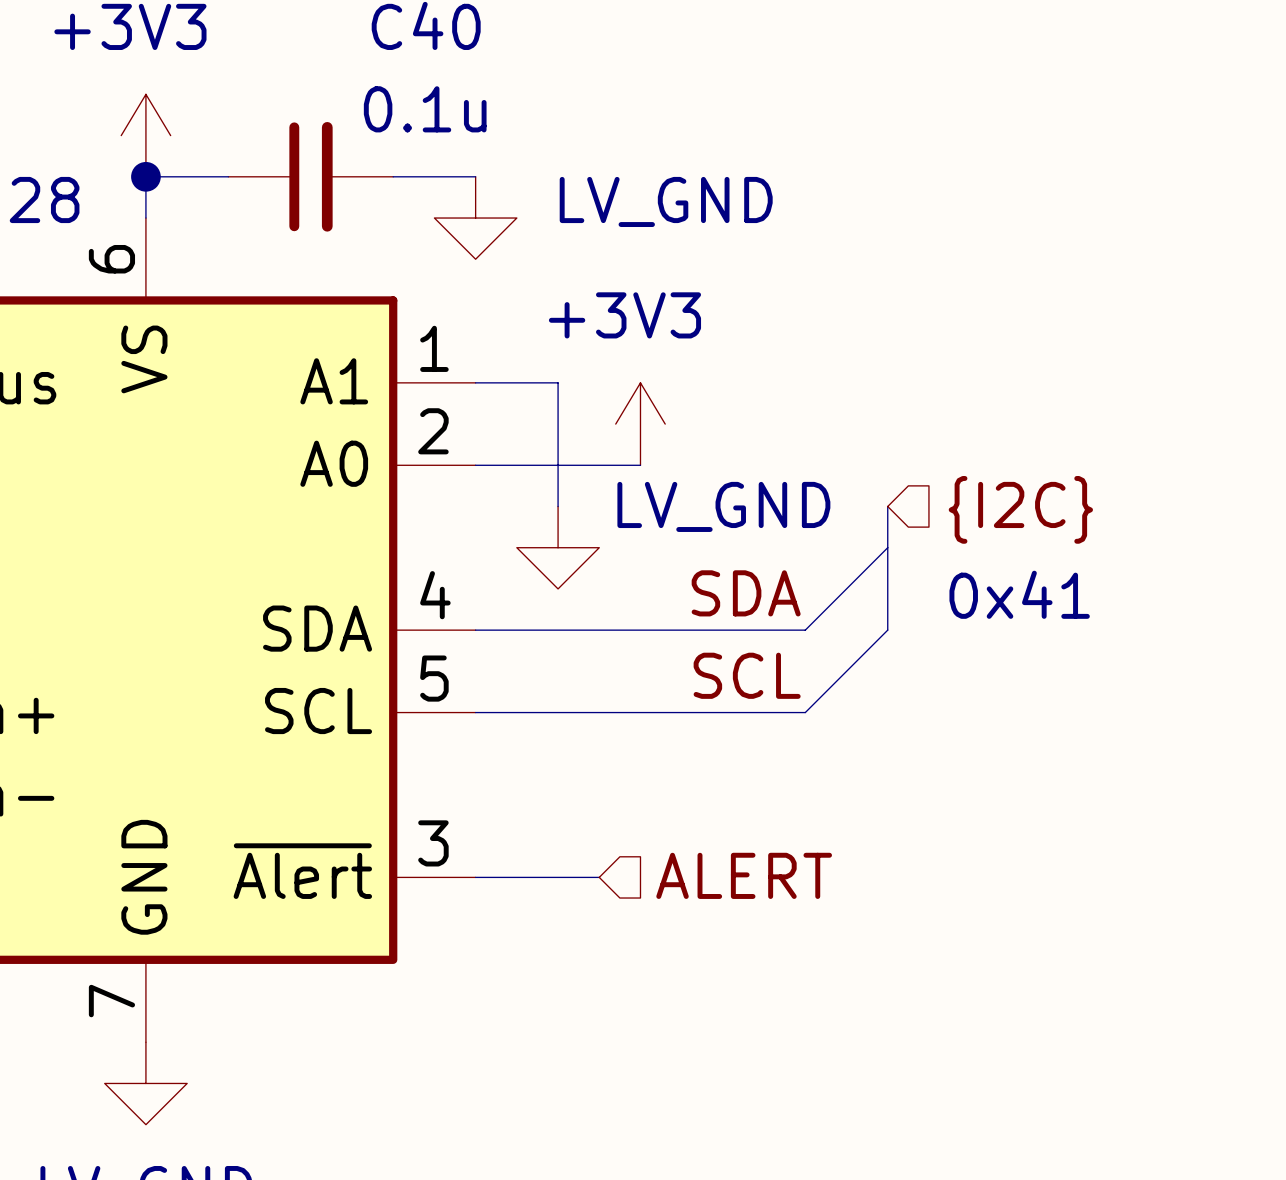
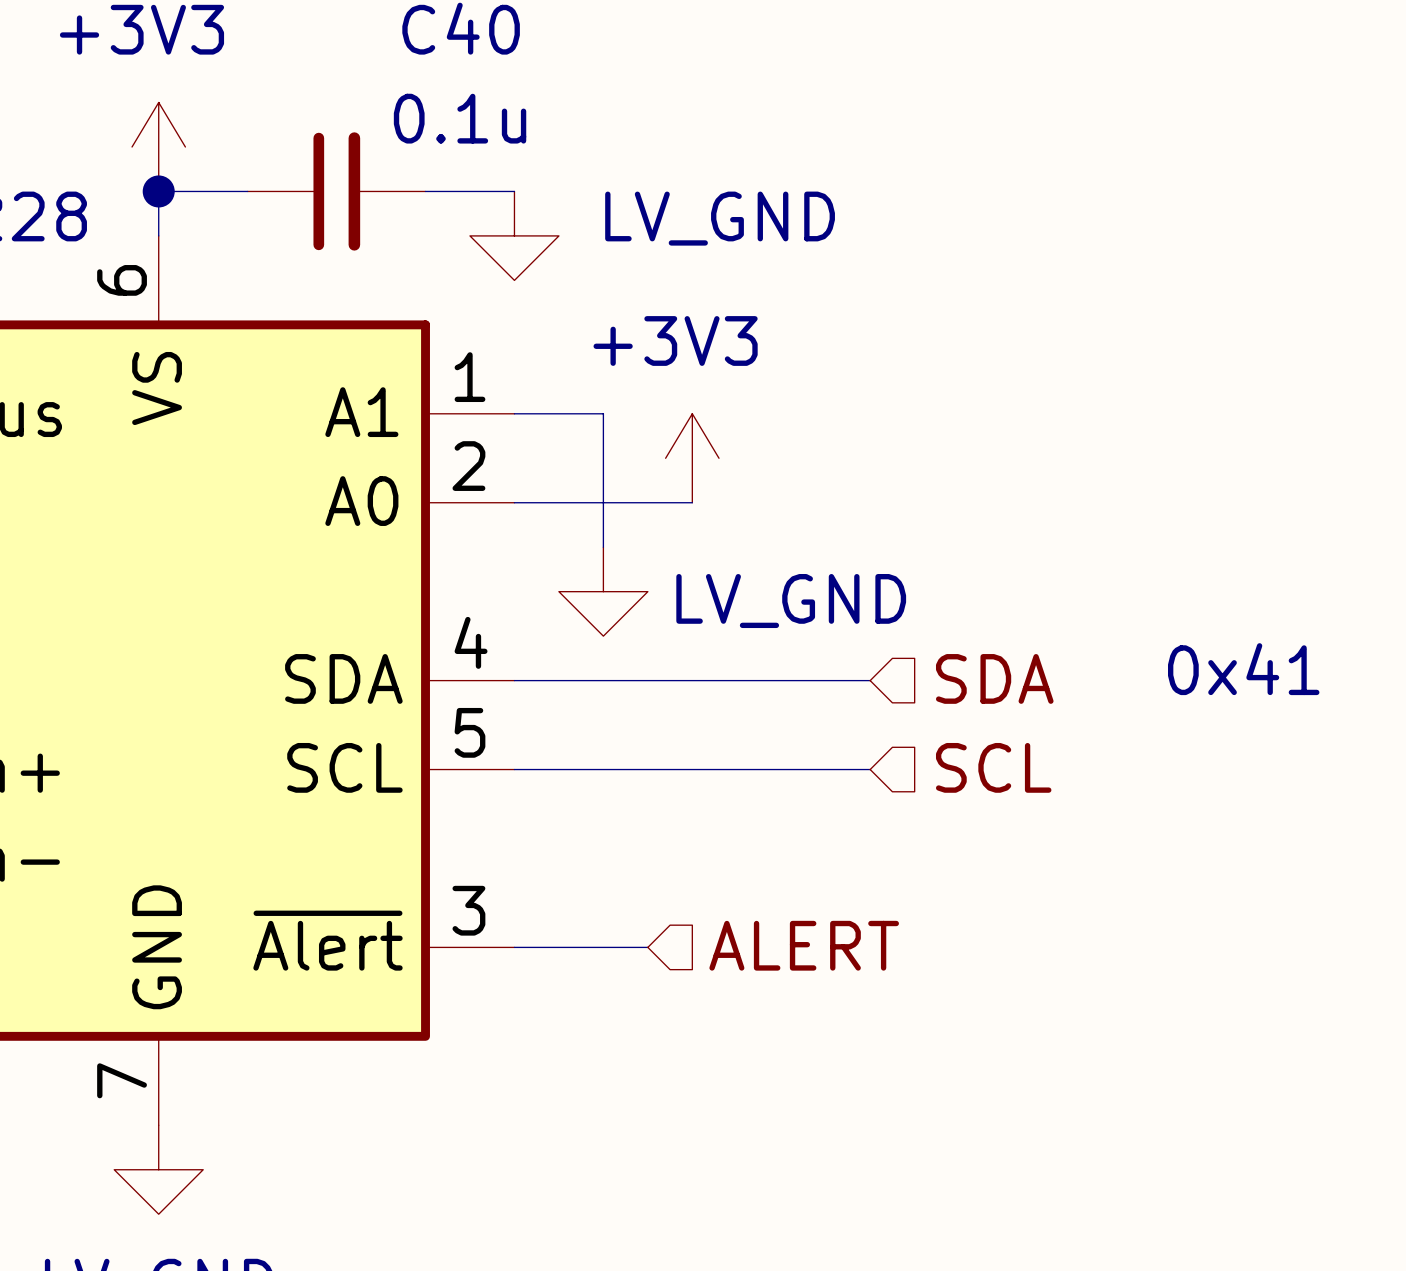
power symbol text position: LV_GND (723, 506) -> LV_GND (791, 601)
bus: (887, 506) (887, 630) -> none
hierarchical label: {I2C} (1020, 509) -> none
wire: (887, 547) (805, 630) -> none
label: SDA (746, 593) -> none
text position: 0x41 (1019, 594) -> 0x41 (1243, 669)
hierarchical label: none -> SDA (994, 678)
wire: (887, 630) (805, 712) -> none
label: SCL (747, 675) -> none
hierarchical label: none -> SCL (993, 767)

